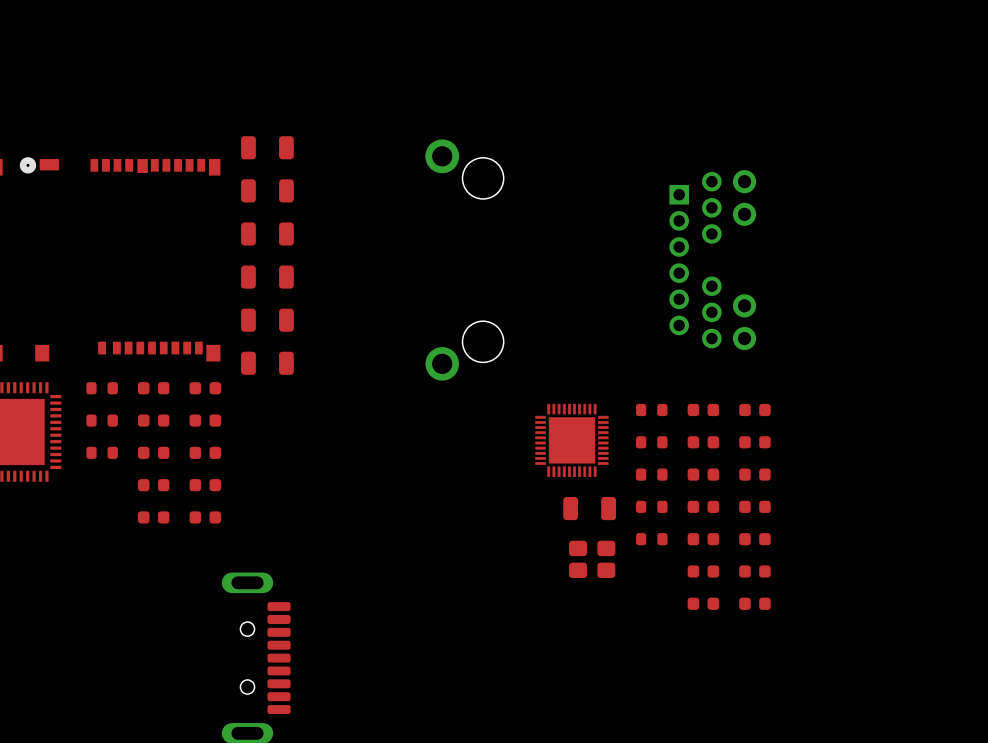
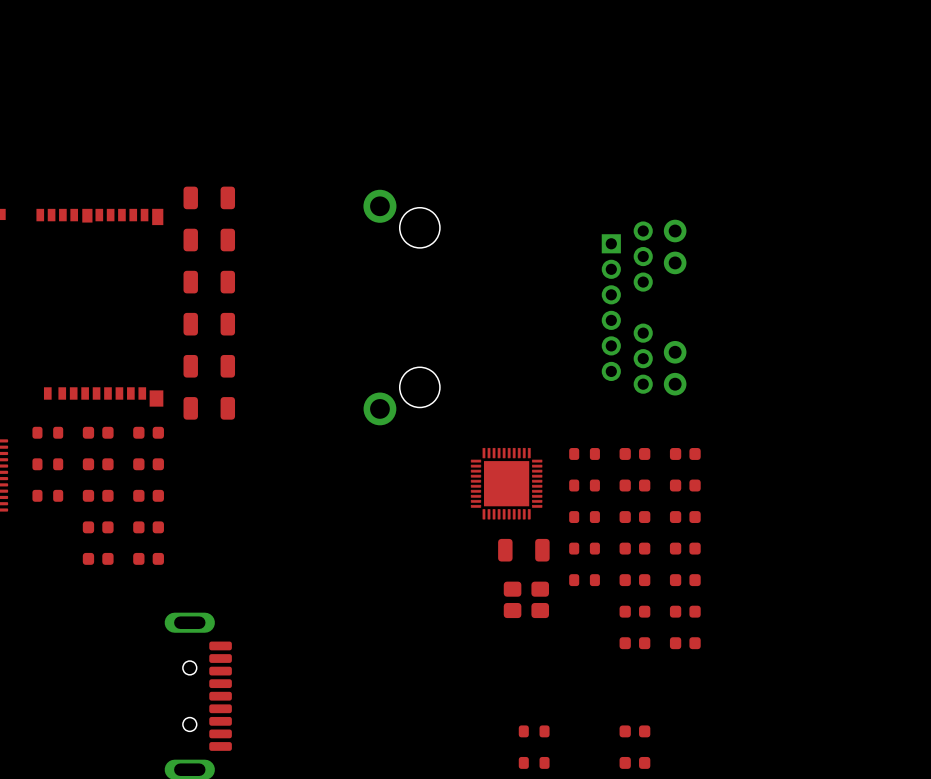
part: none -> (534, 731)
part: none -> (634, 731)
part: none -> (534, 762)
part: none -> (634, 762)

